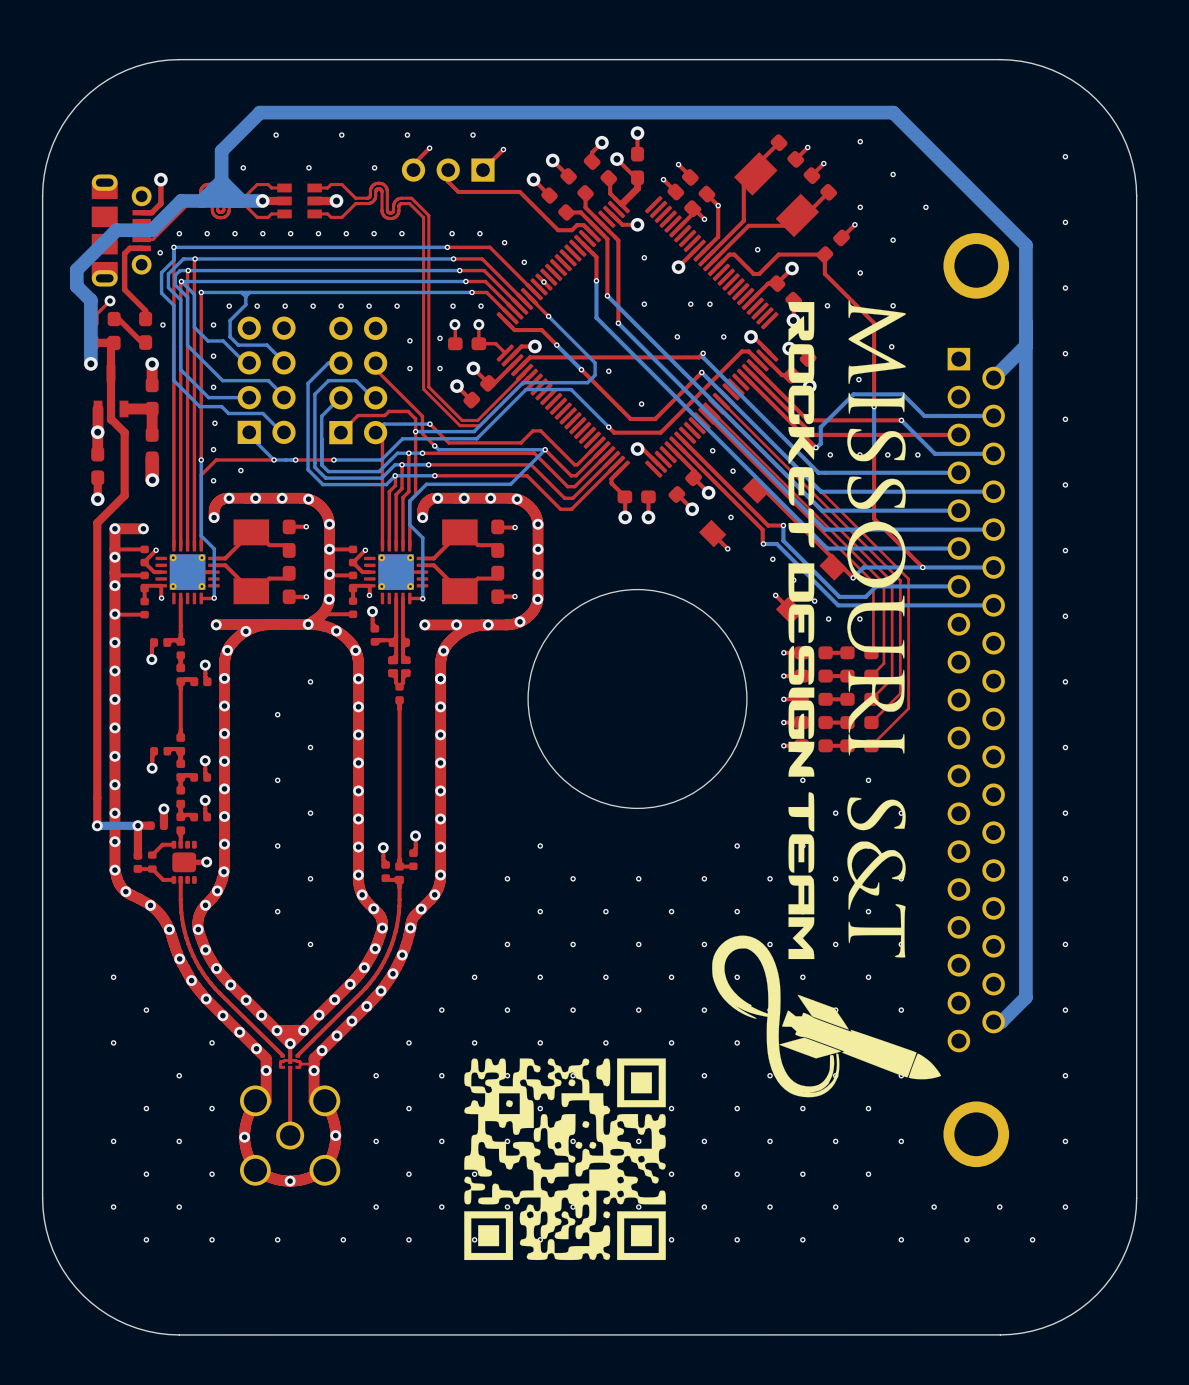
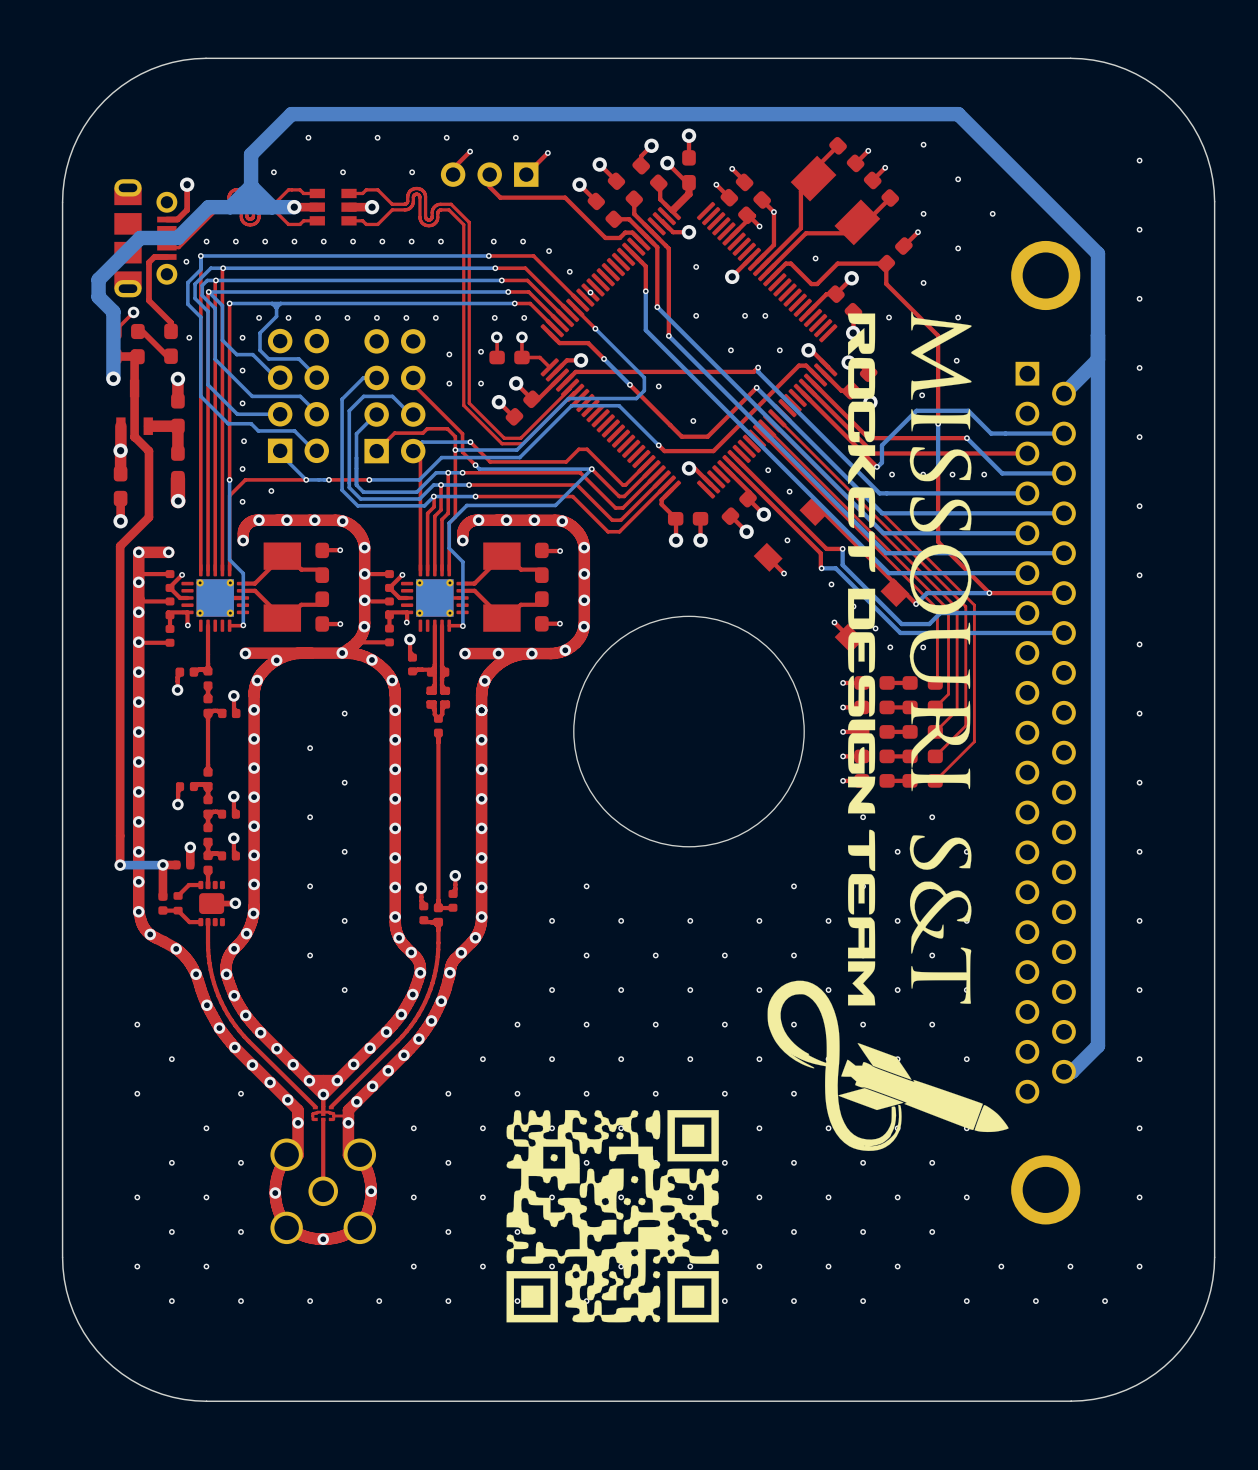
top track: none -> (1063, 593) (989, 593)
bottom track: (993, 567) (922, 567) -> none

